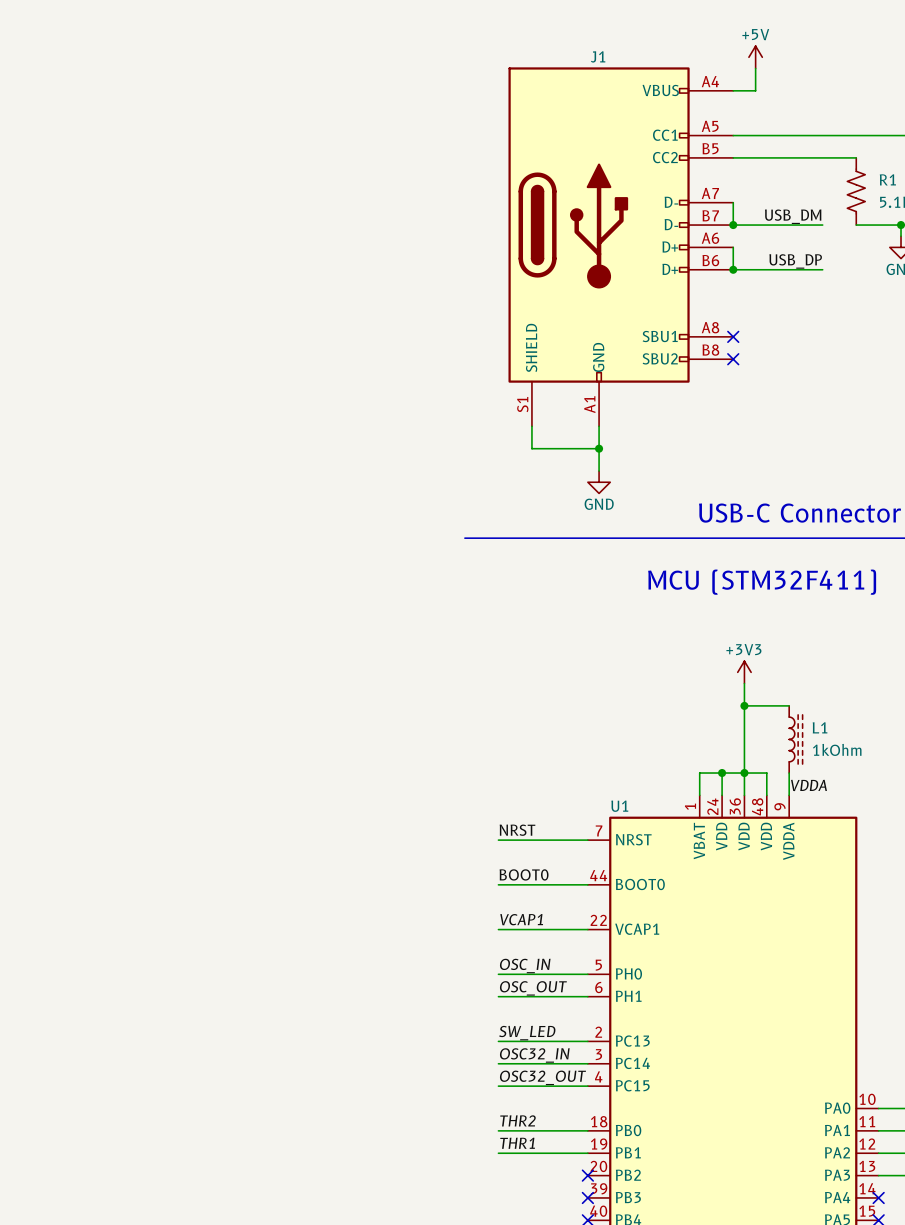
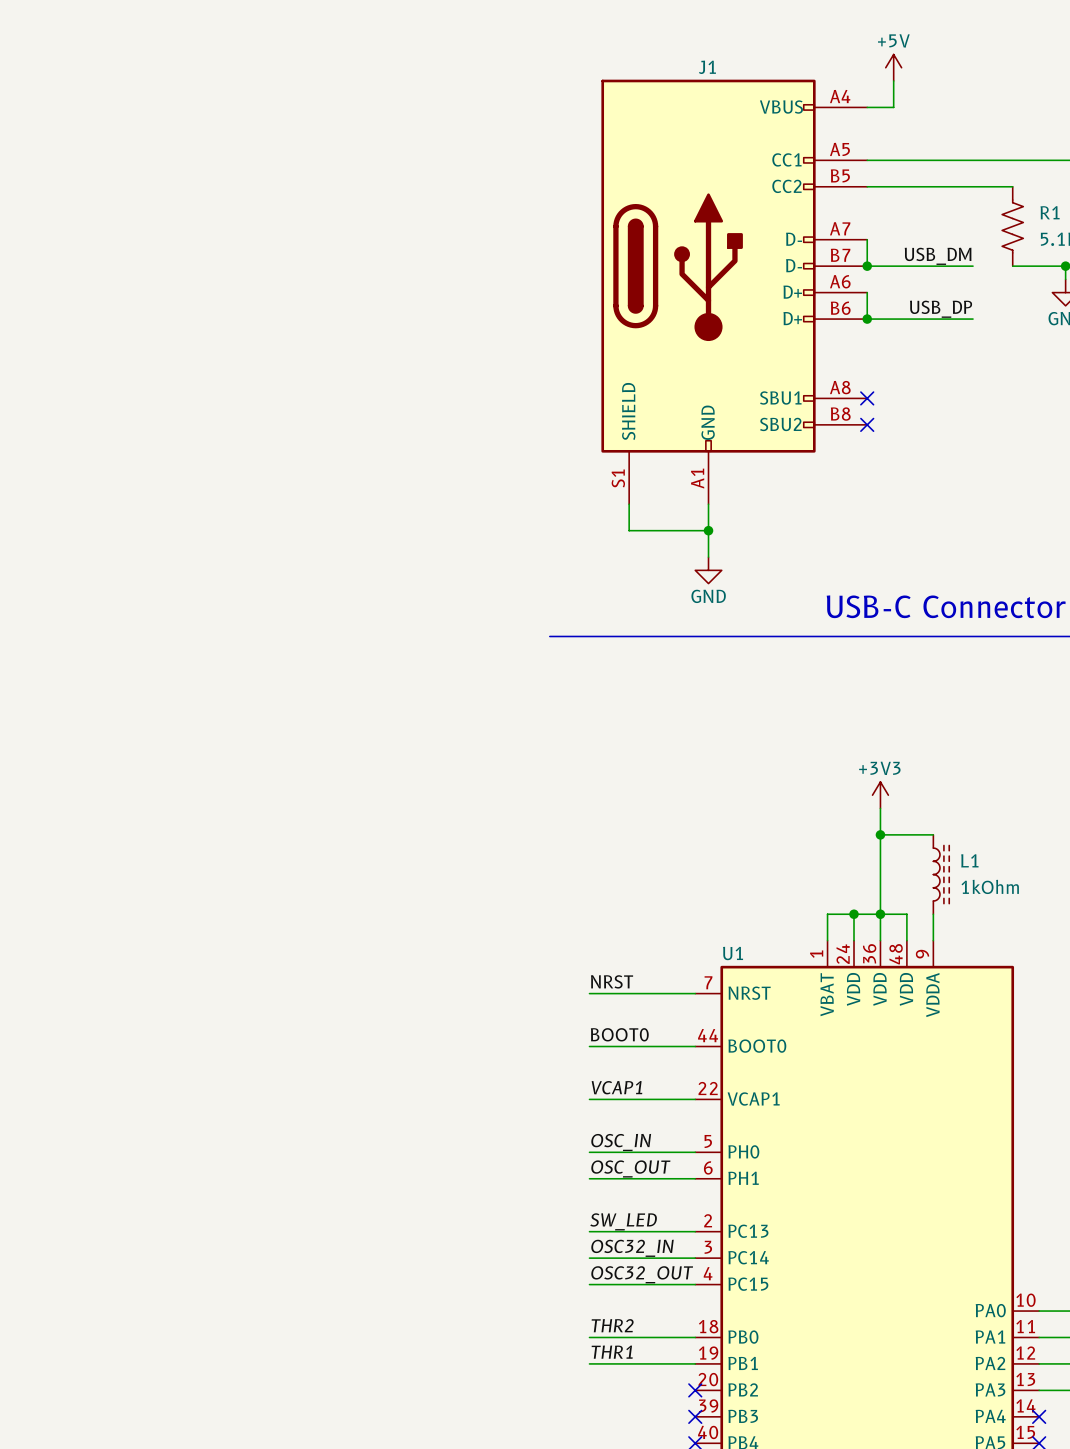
text: MCU (STM32F411) (762, 582) -> none
label: VDDA (809, 785) -> none

